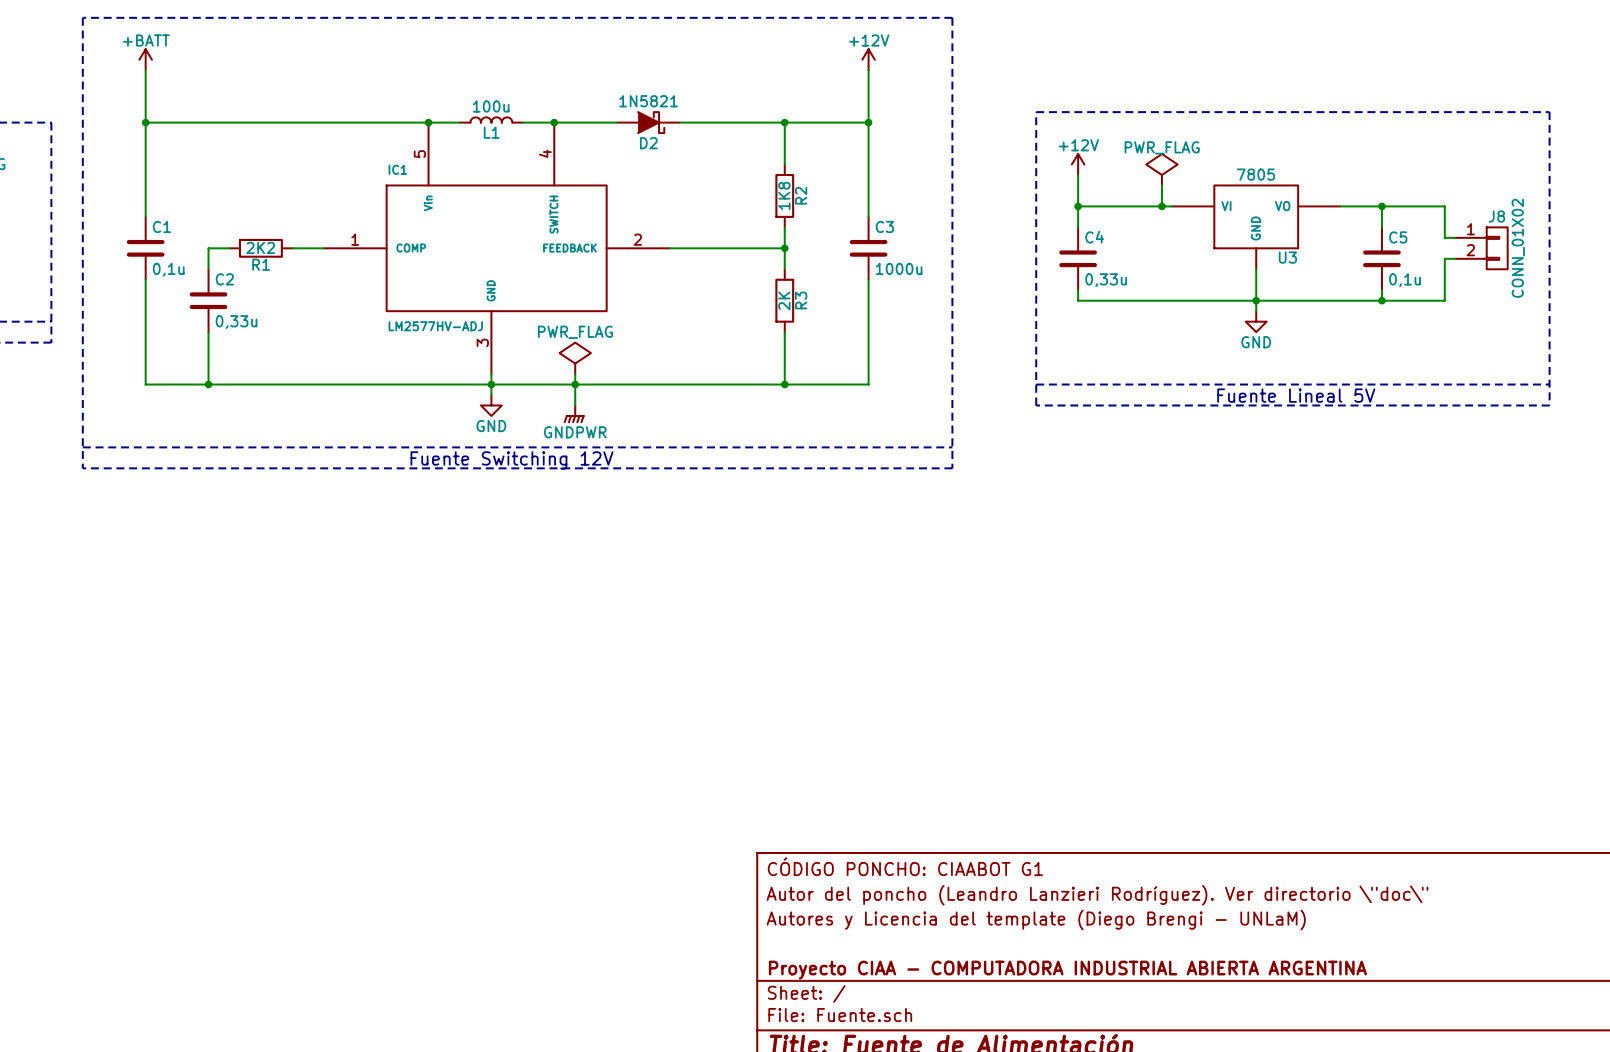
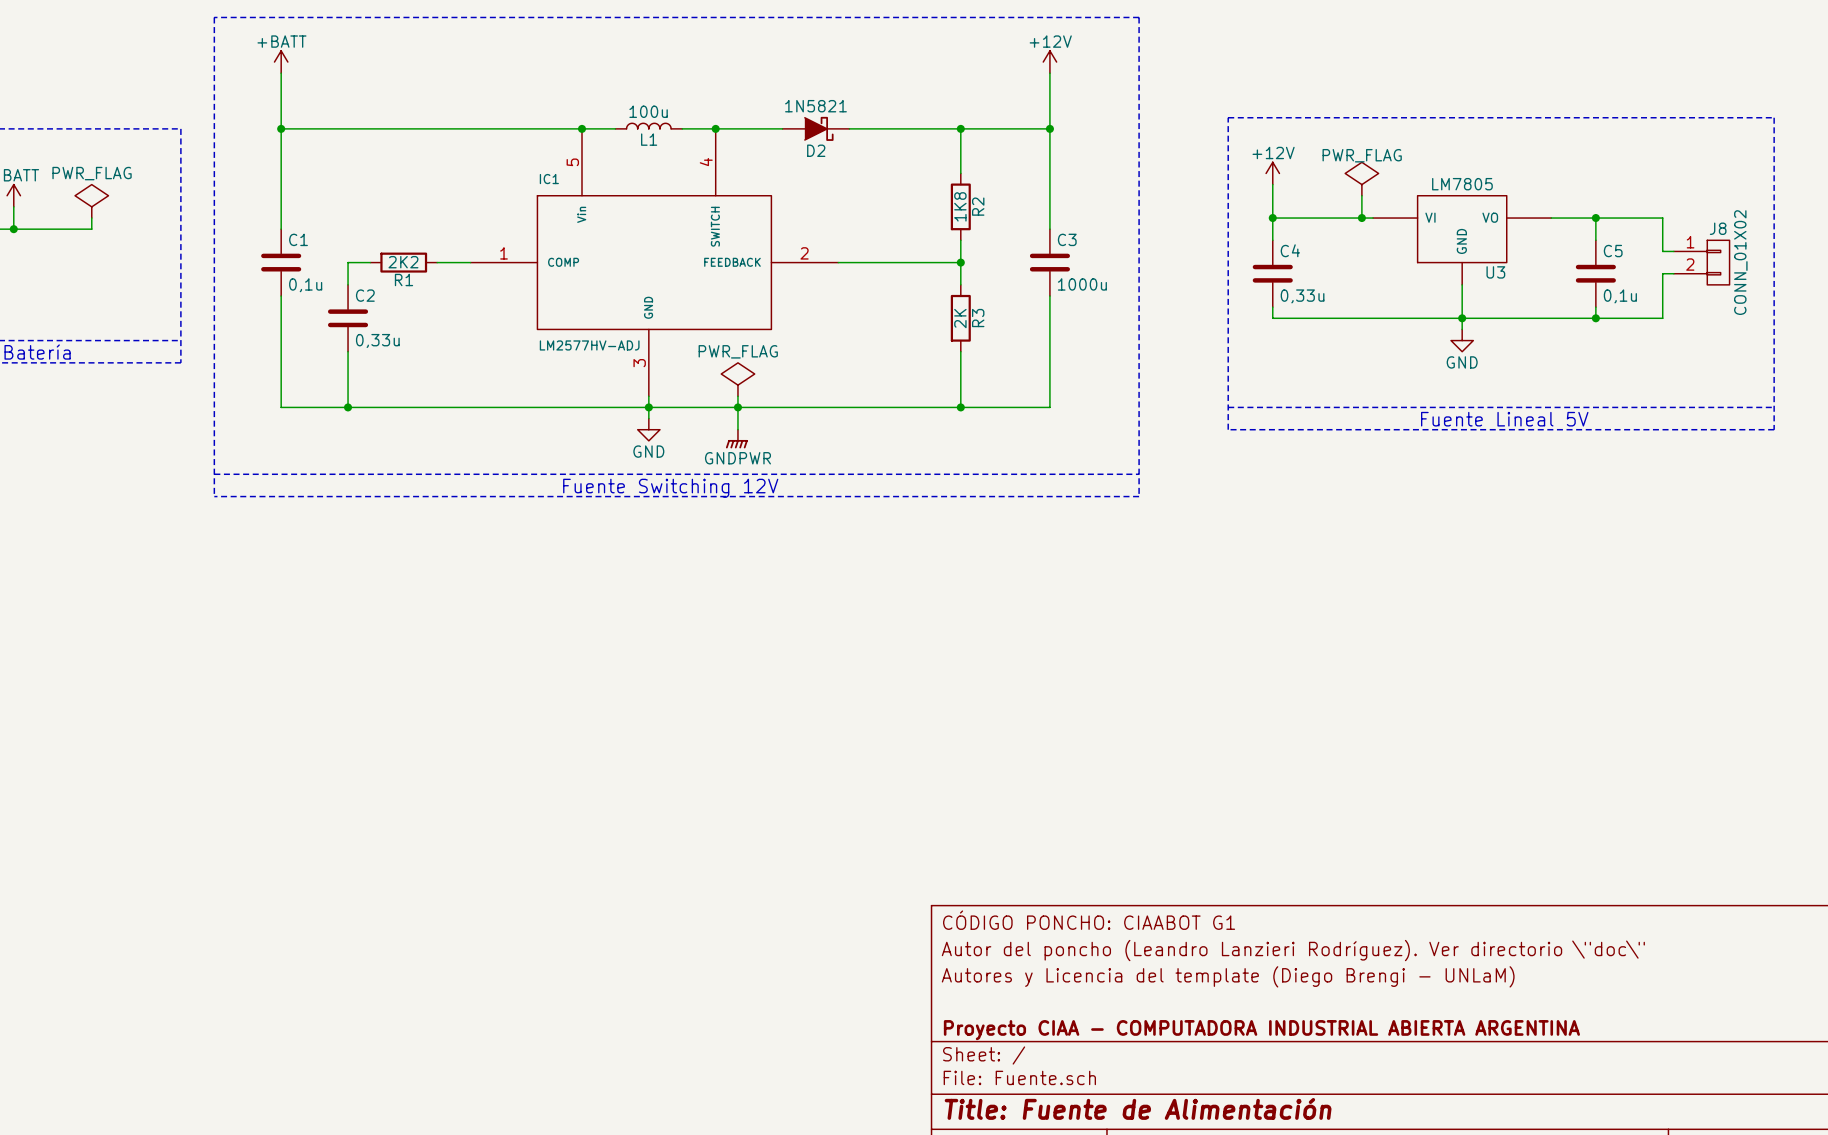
U3 value: 7805 (1255, 174) -> LM7805 (1462, 184)

